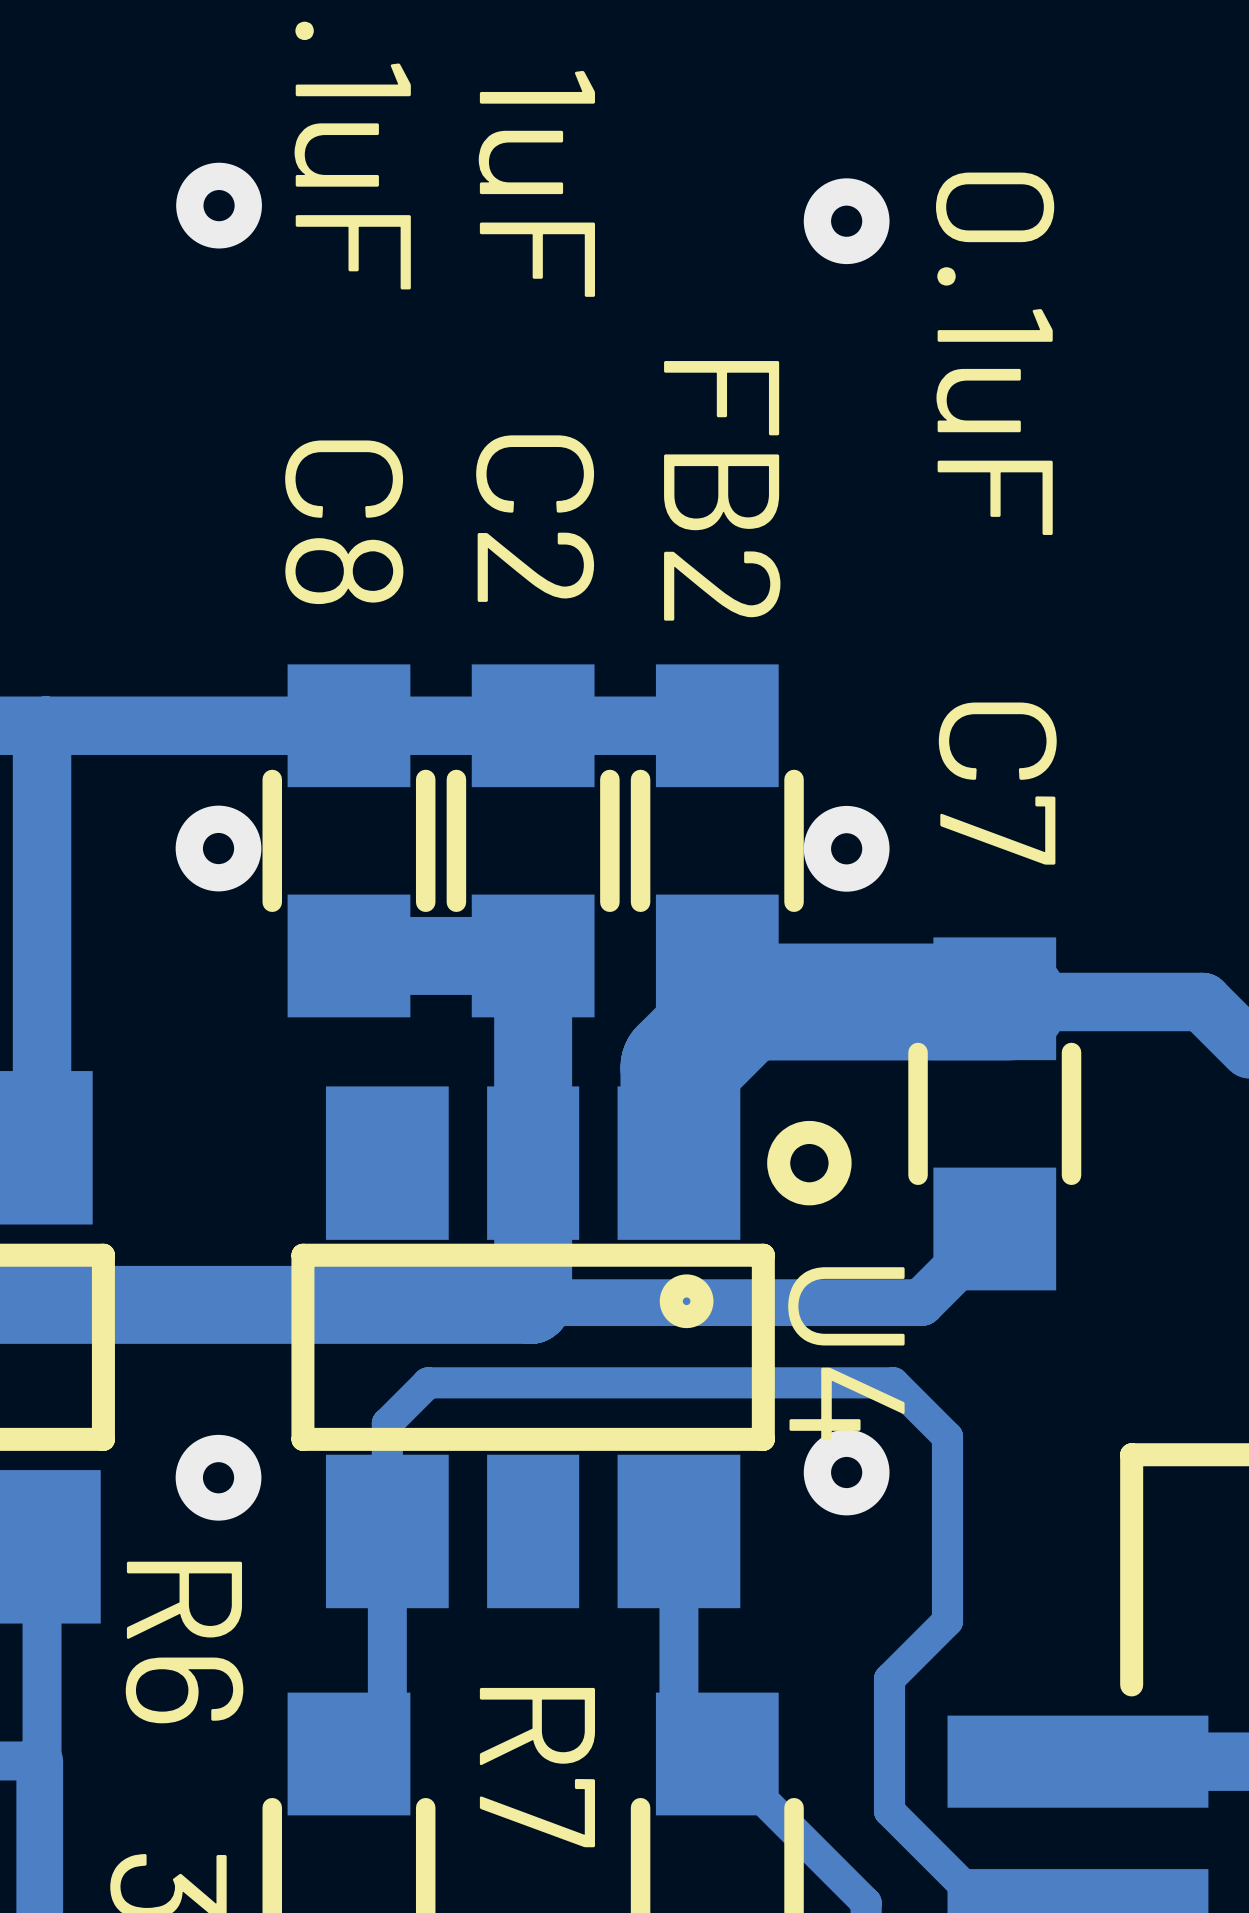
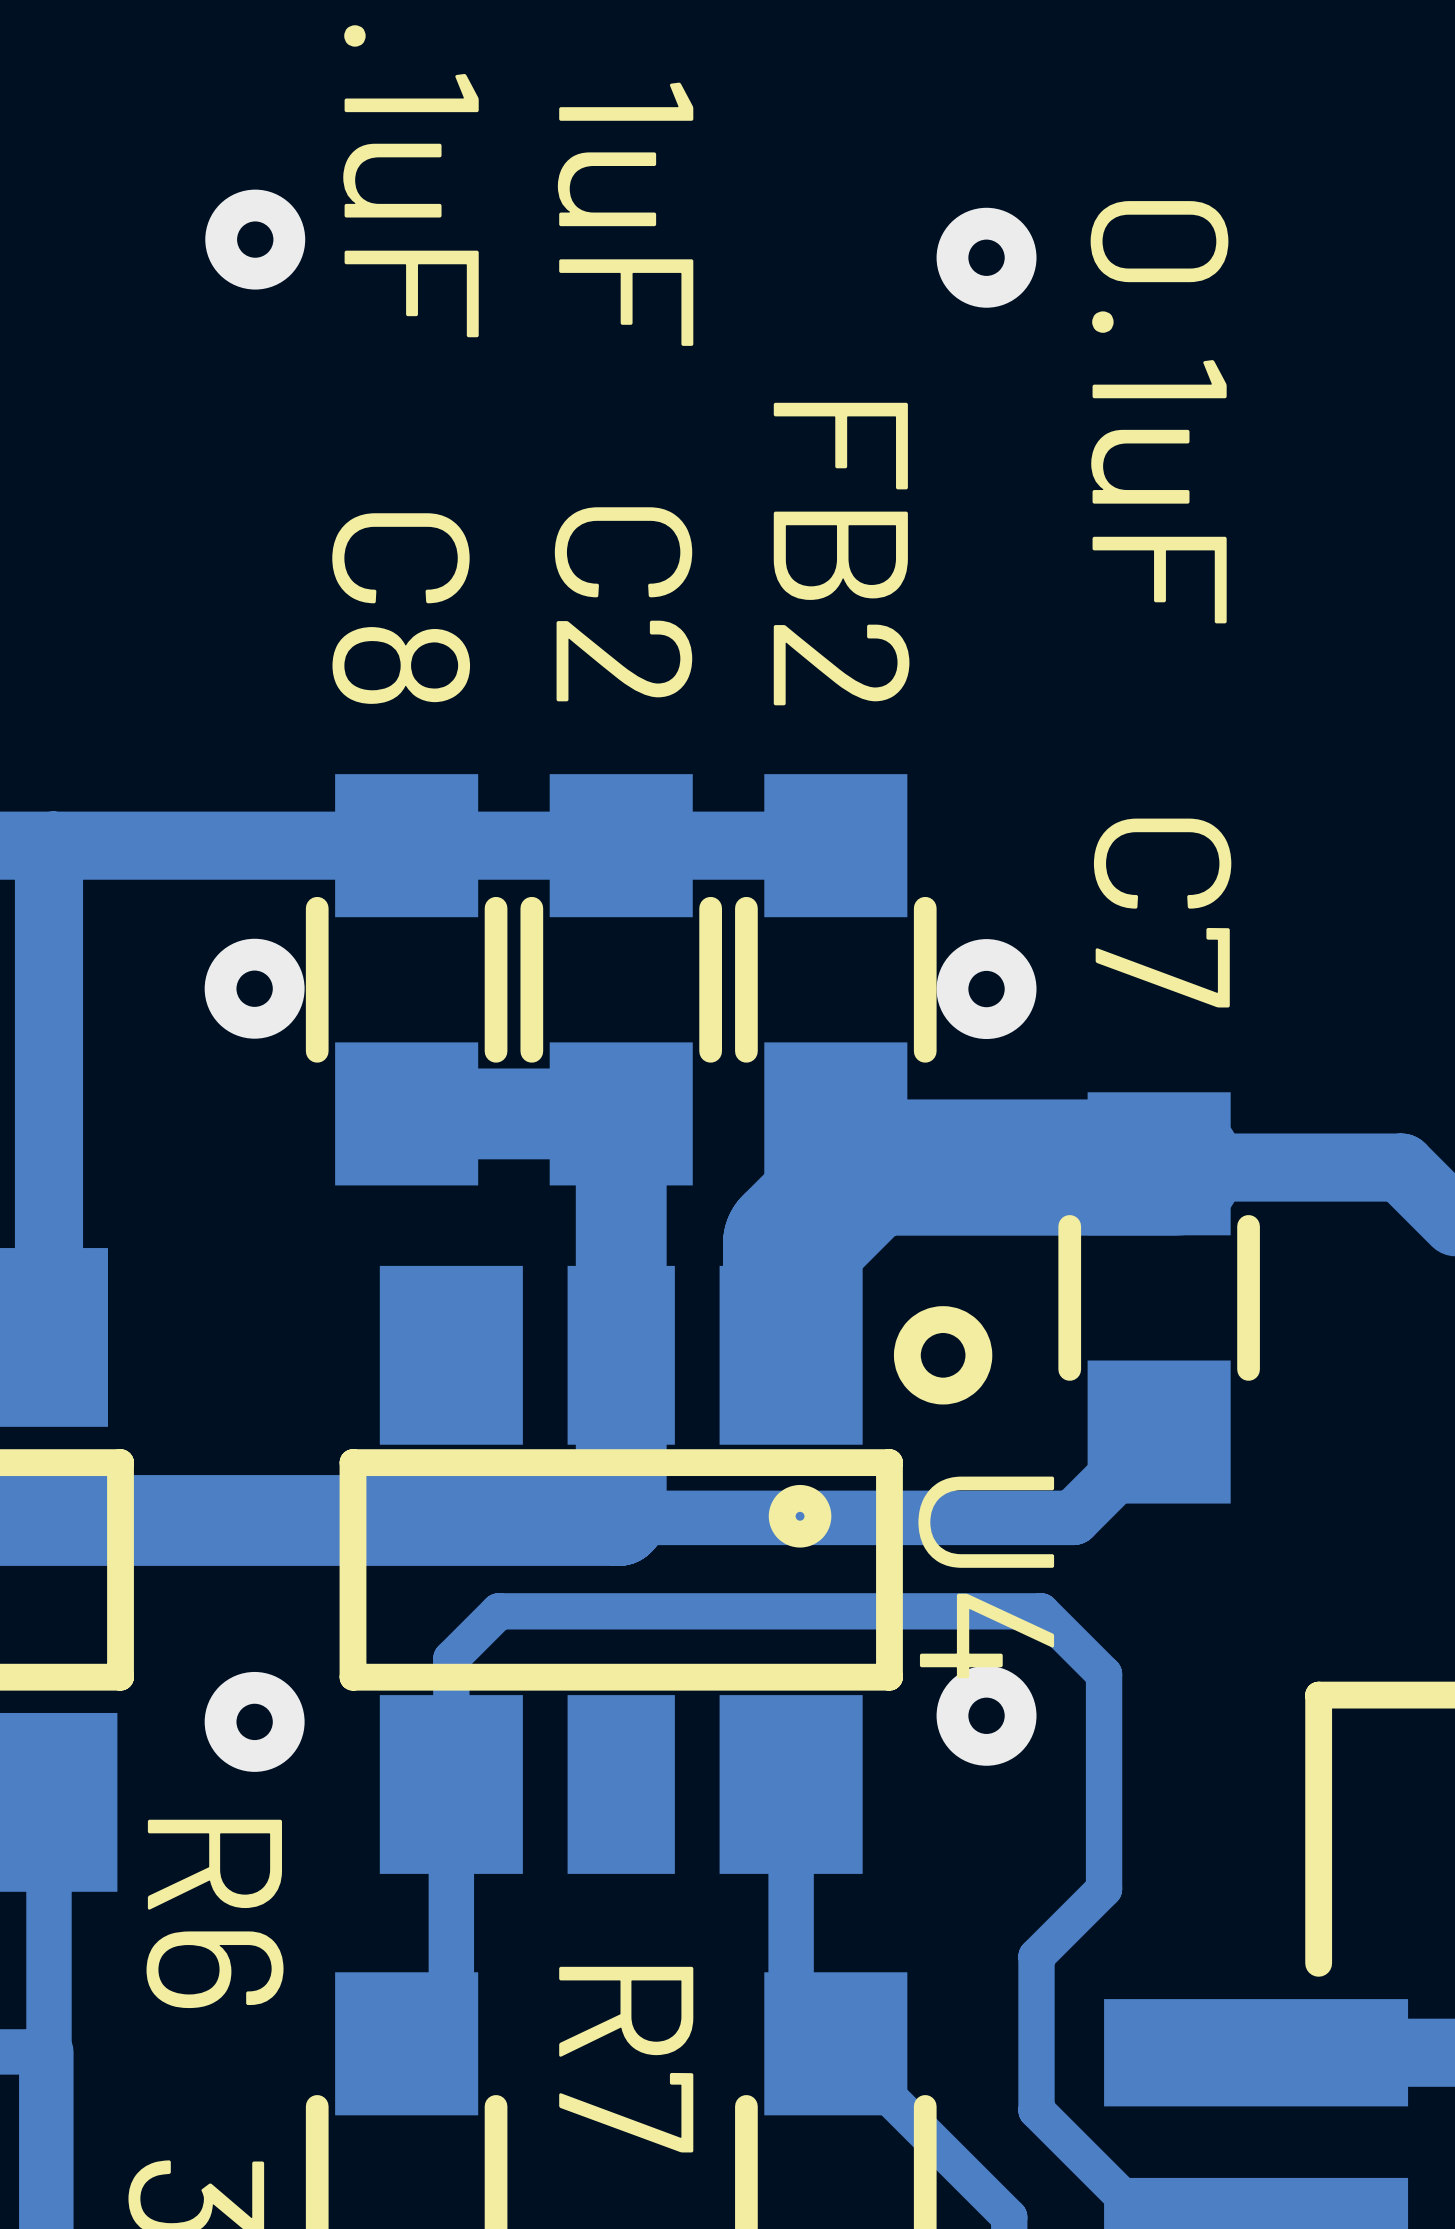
FB2 name position: FB2 (722, 490) -> FB2 (841, 554)

